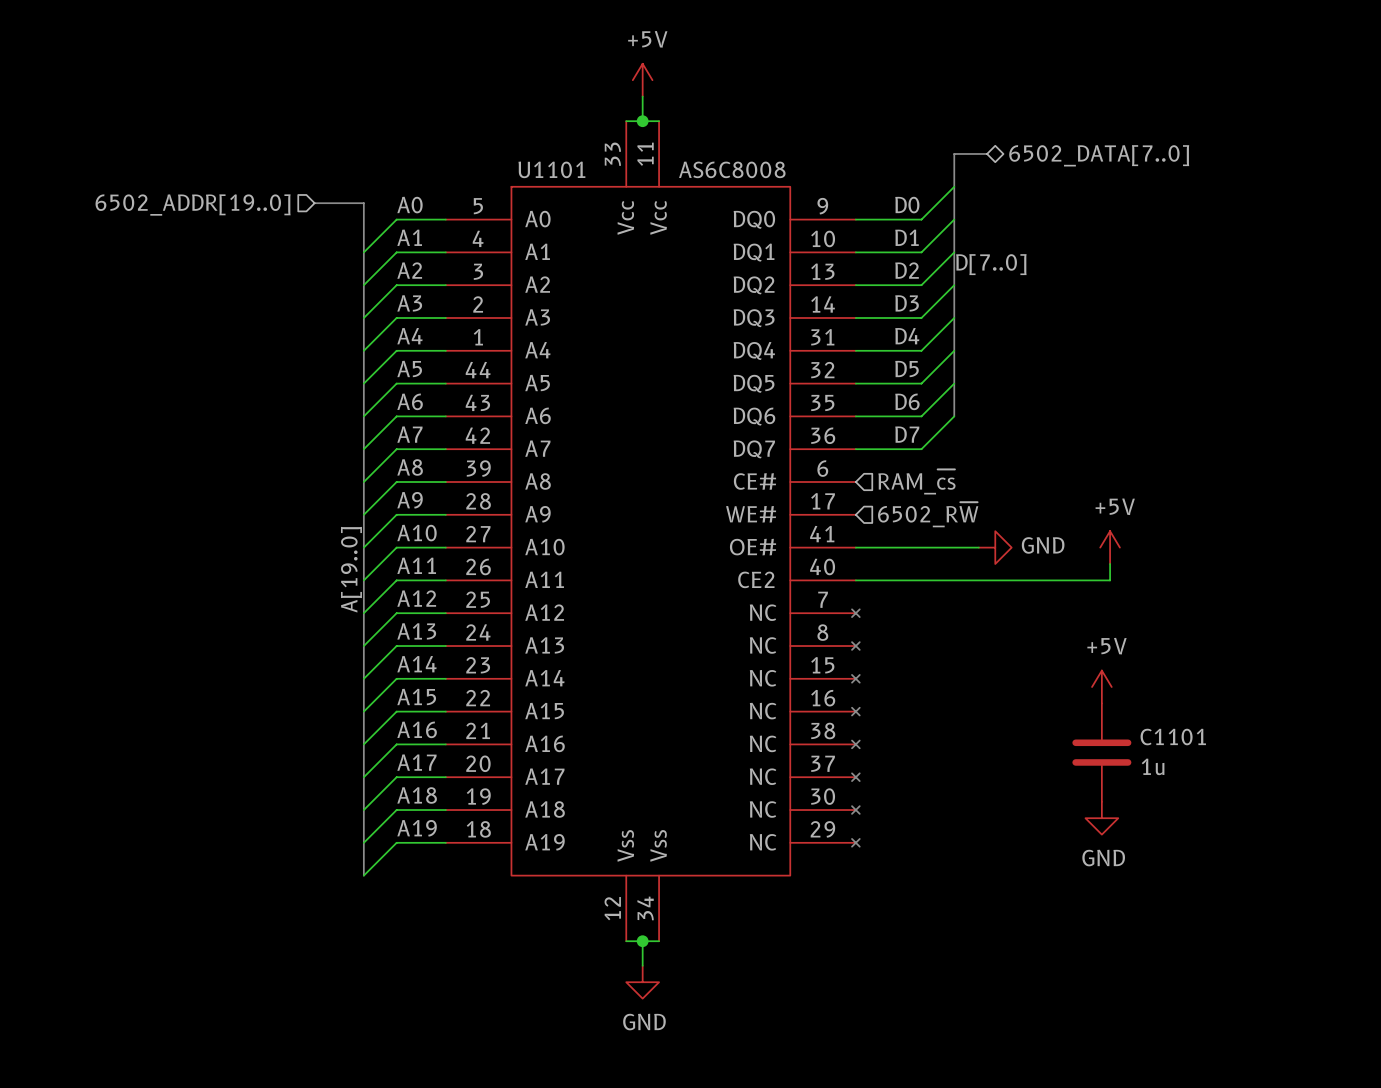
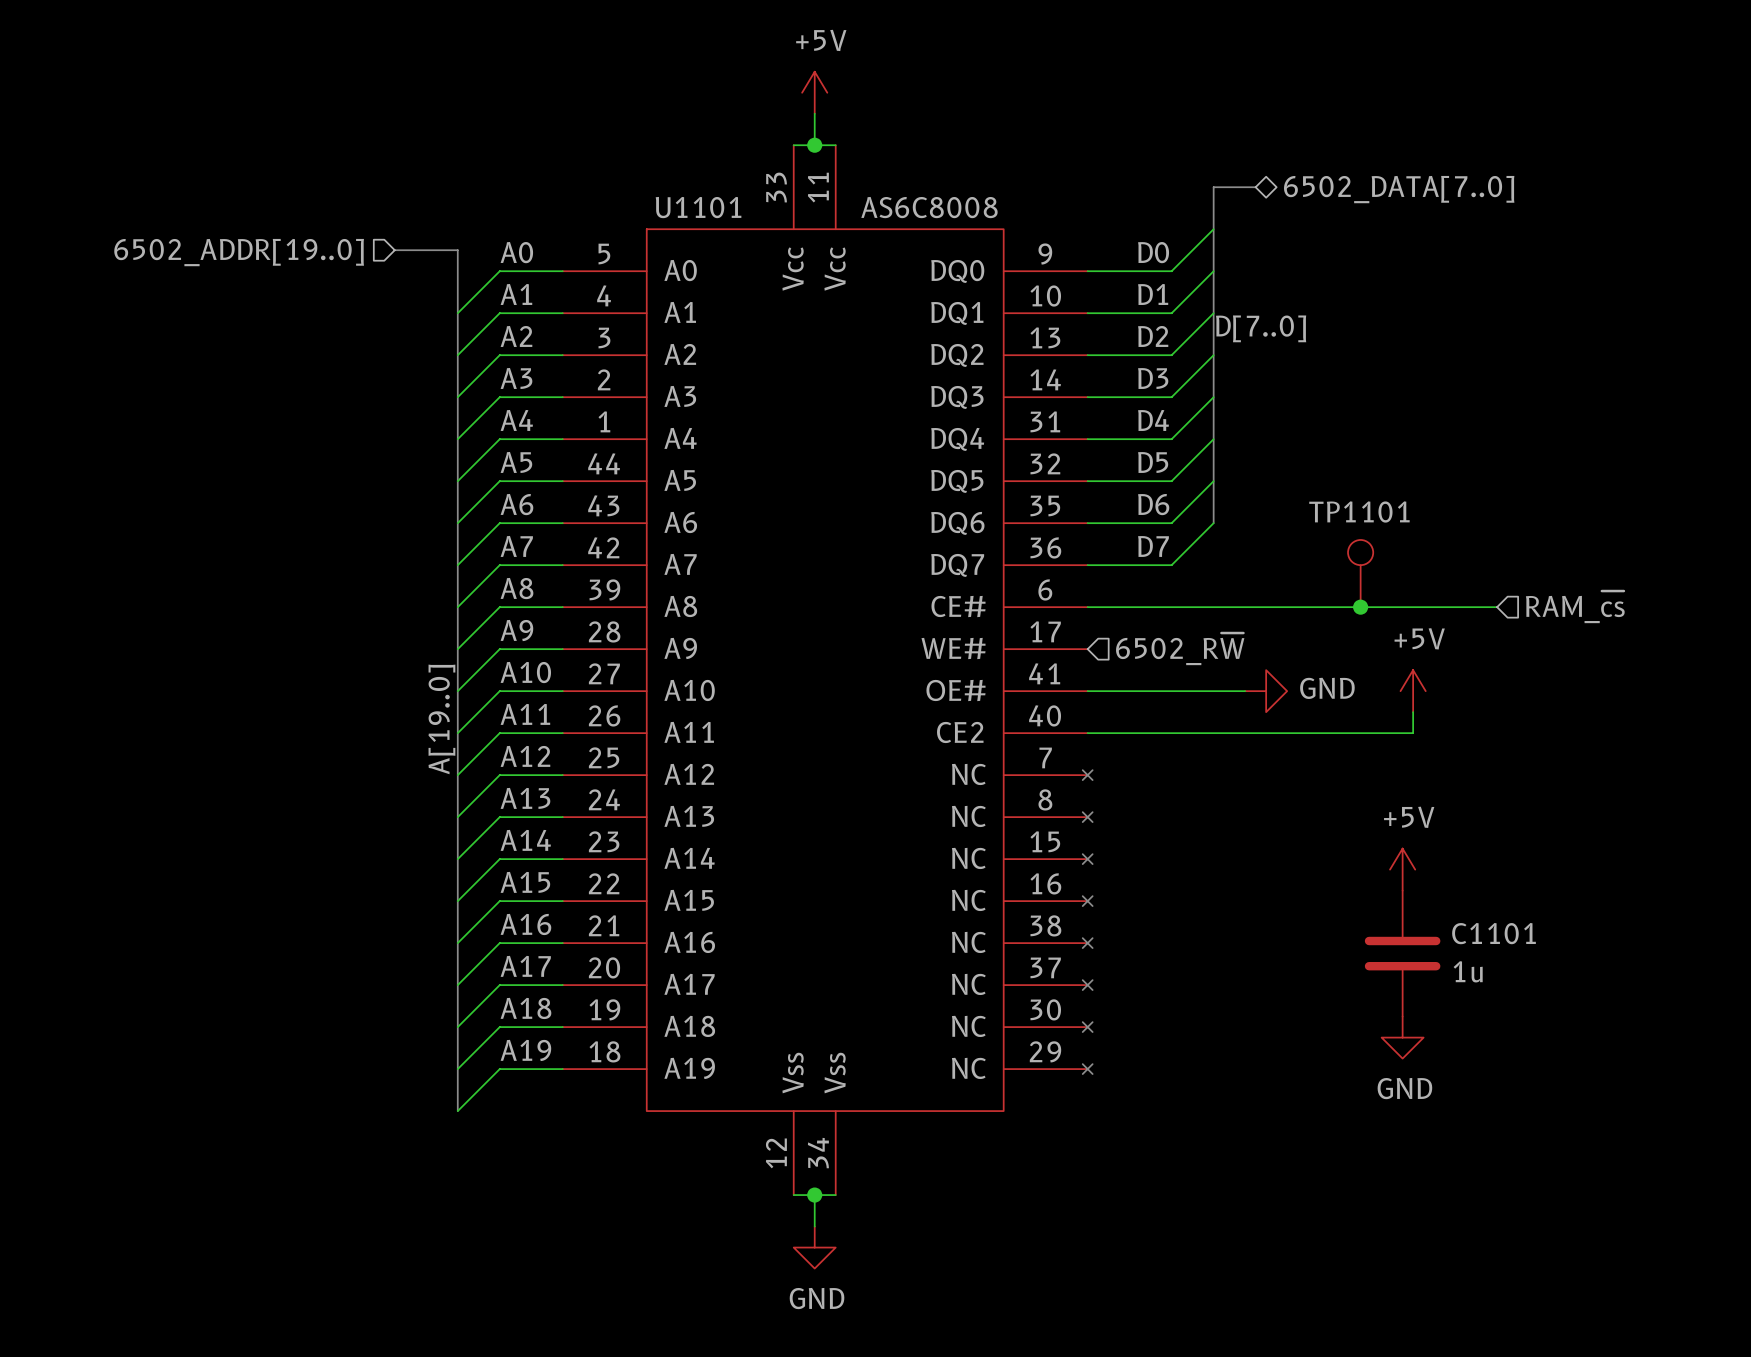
TP1101: none -> (1360, 573)
hierarchical label position: RAM_~{cs} (916, 481) -> RAM_~{cs} (1575, 607)
wire: none -> (1087, 607) (1497, 607)
junction: none -> (1360, 607)

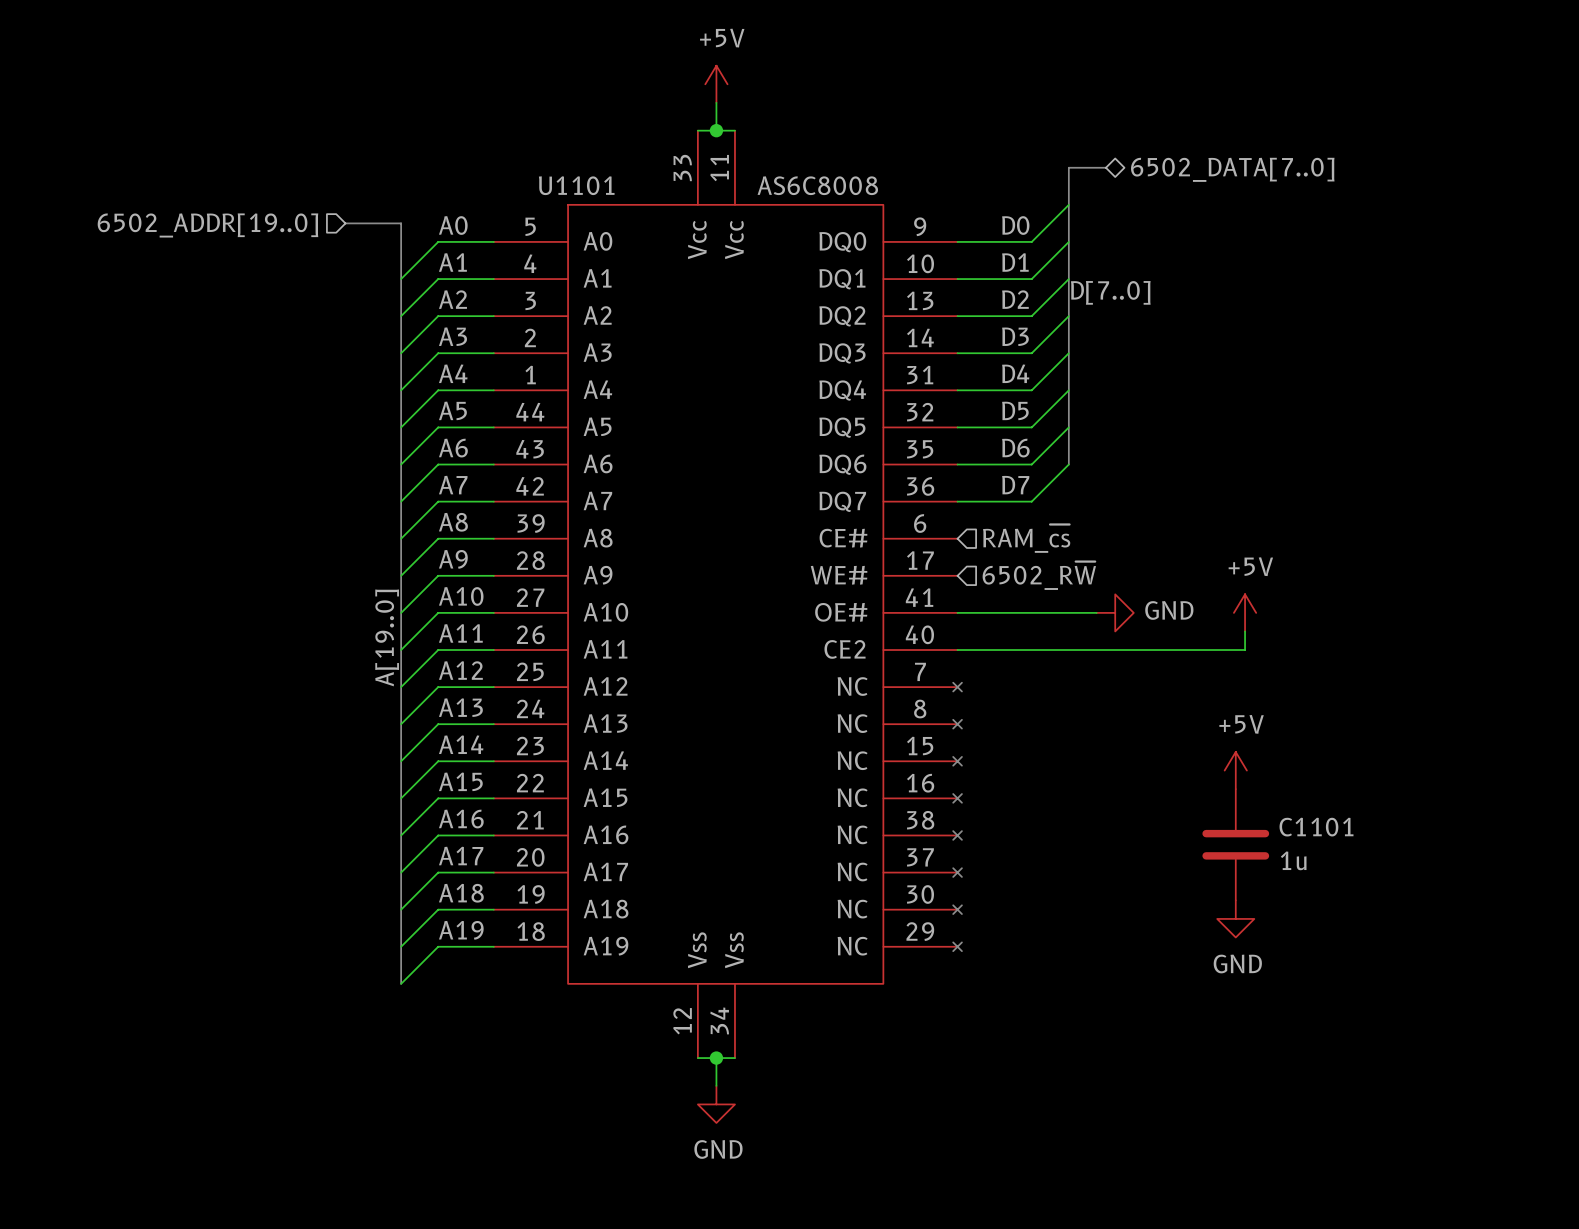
U1101 name position: U1101 (698, 207) -> U1101 (576, 185)
TP1101: (1360, 573) -> none
wire: (1087, 607) (1497, 607) -> none
junction: (1360, 607) -> none
hierarchical label position: RAM_~{cs} (1575, 607) -> RAM_~{cs} (1026, 538)

